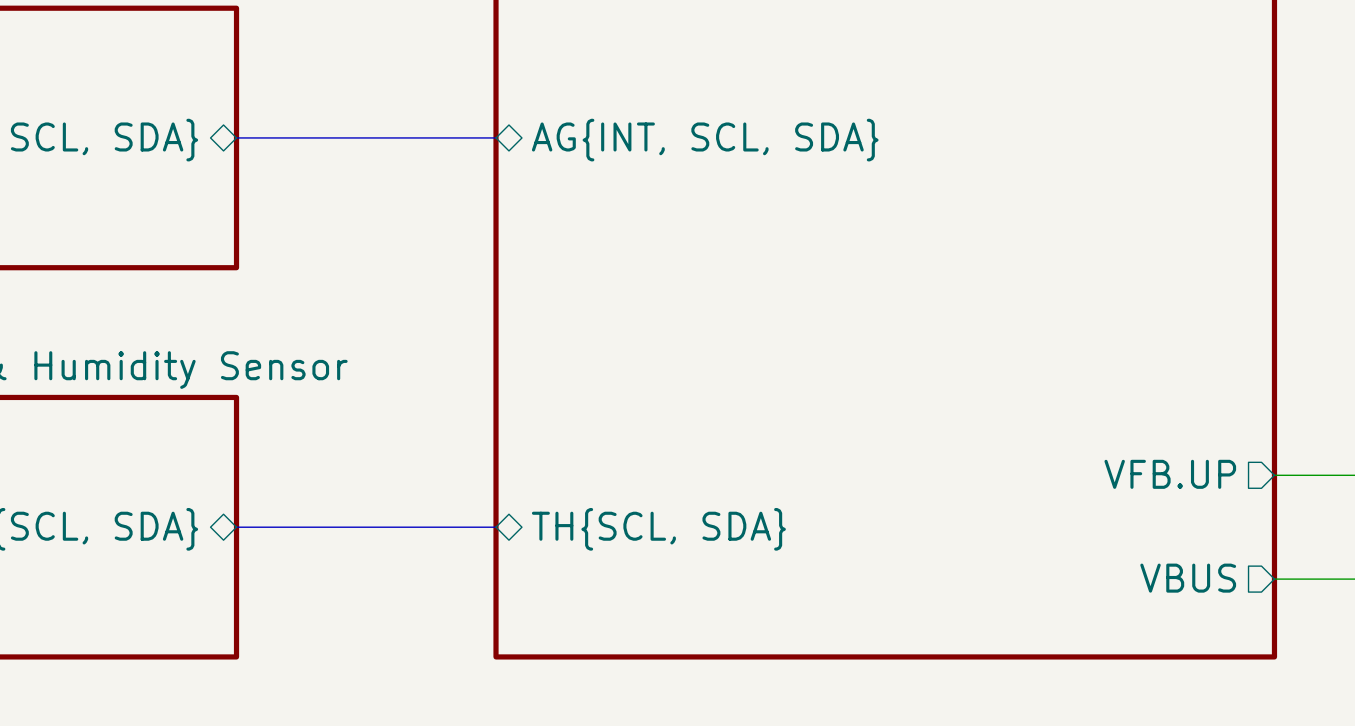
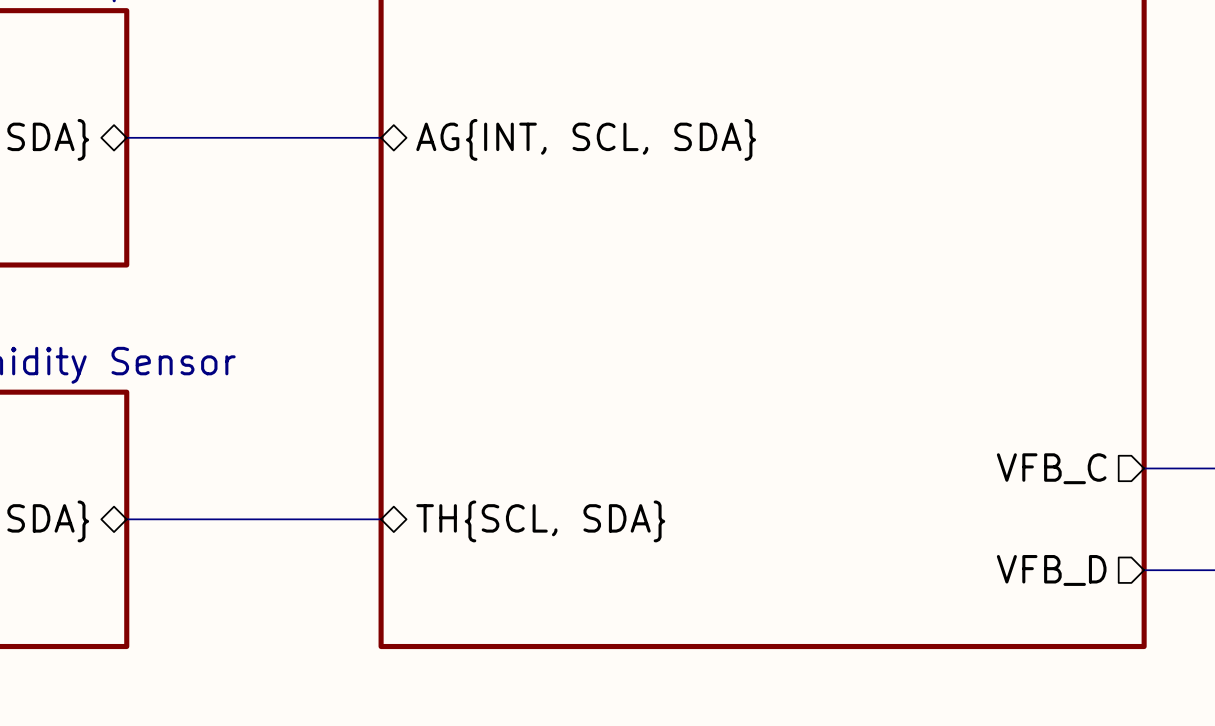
sheet pin: VFB.UP (1170, 474) -> VFB_C (1051, 468)
sheet pin: VBUS (1188, 578) -> VFB_D (1051, 570)

